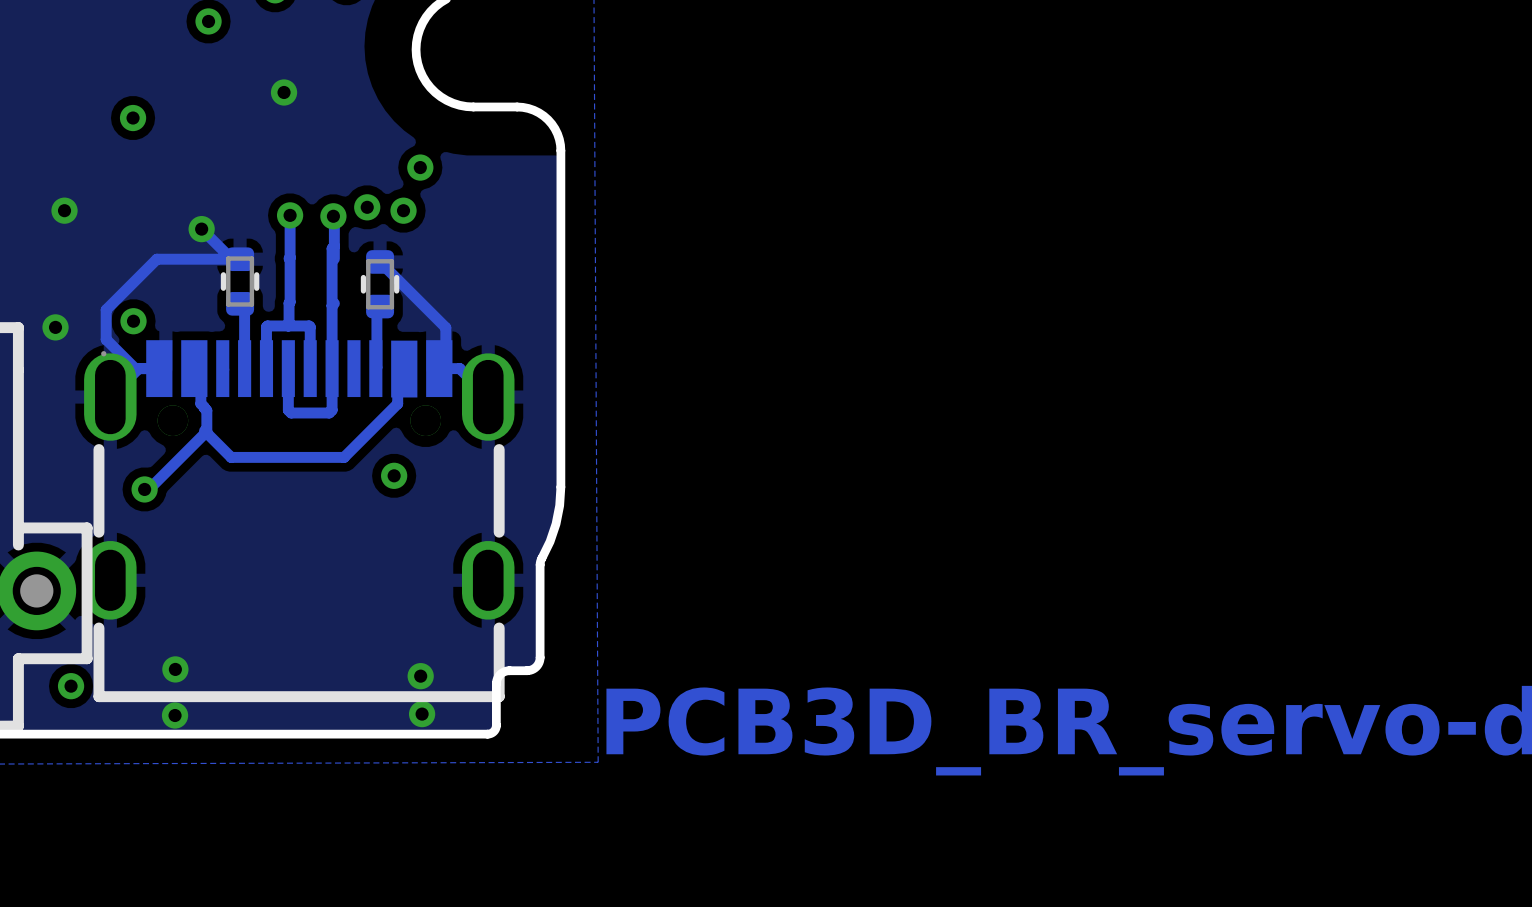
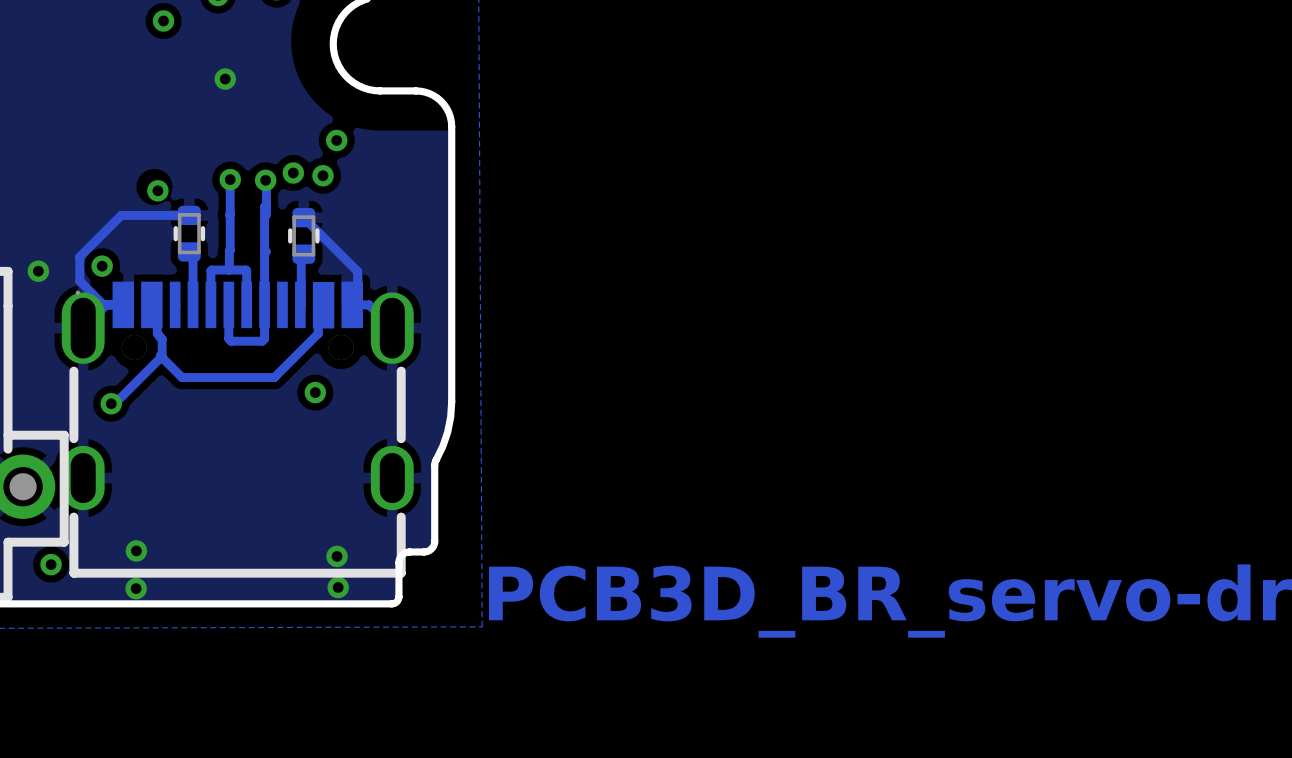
via: (133, 118) -> none
via: (64, 210) -> none
track: (201, 229) (231, 259) -> none

